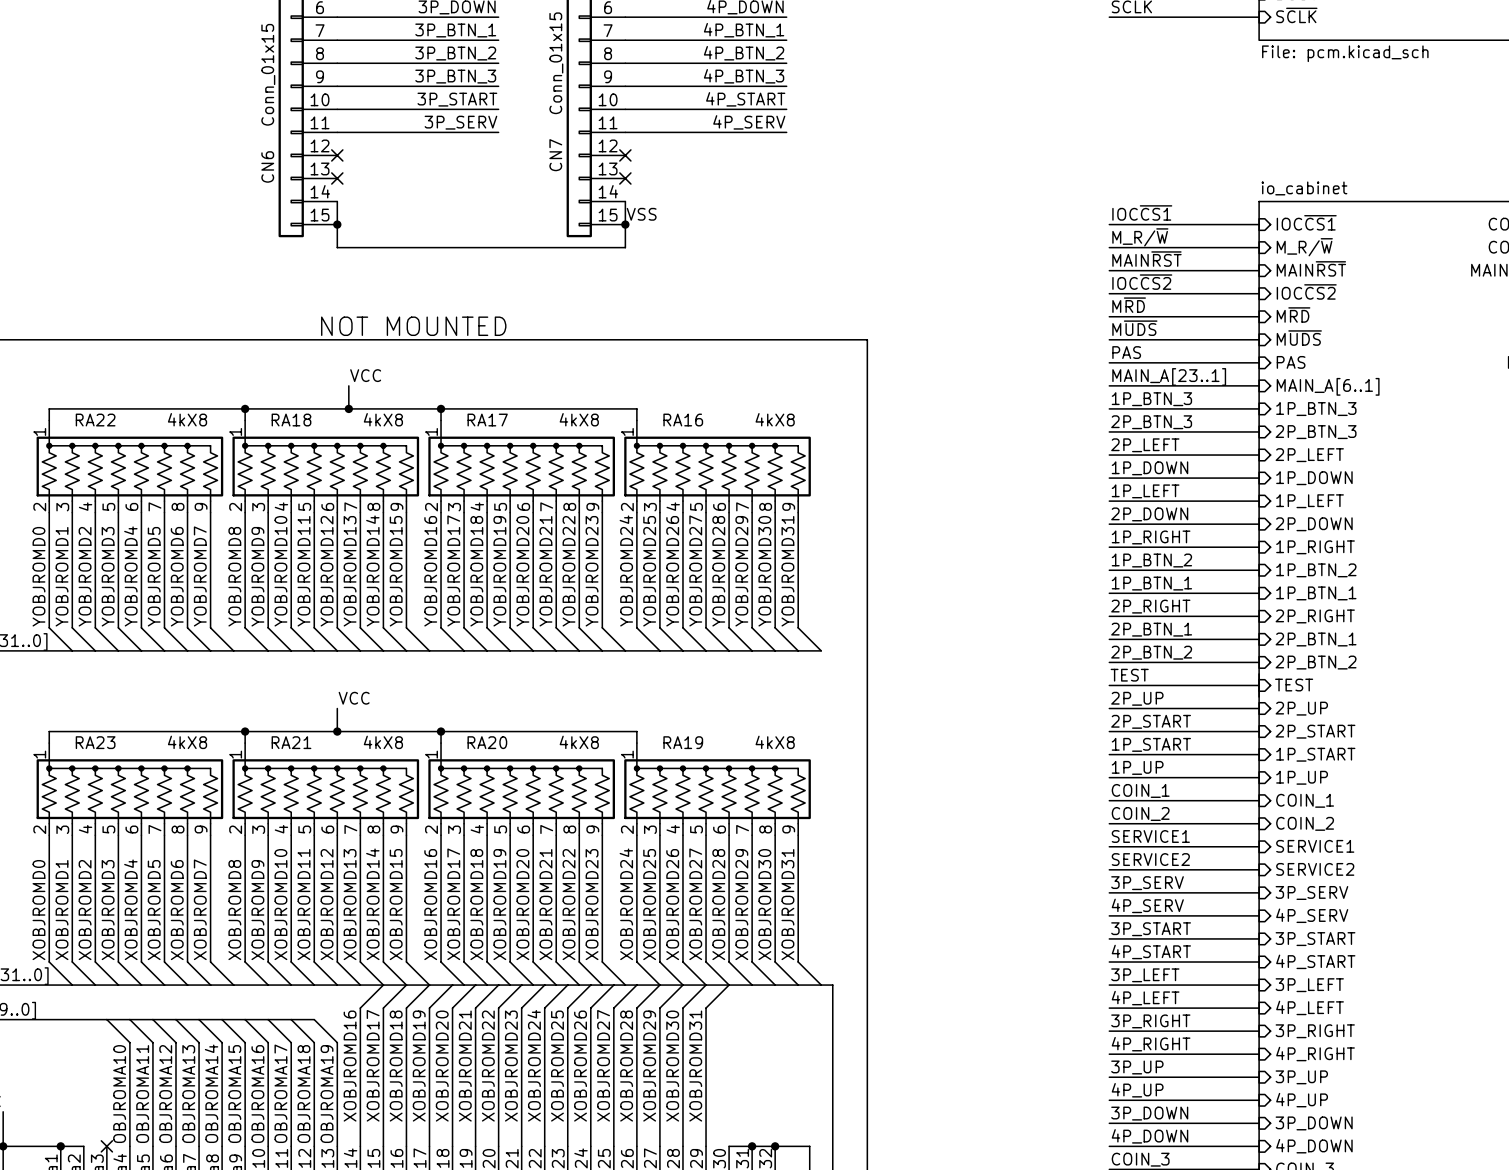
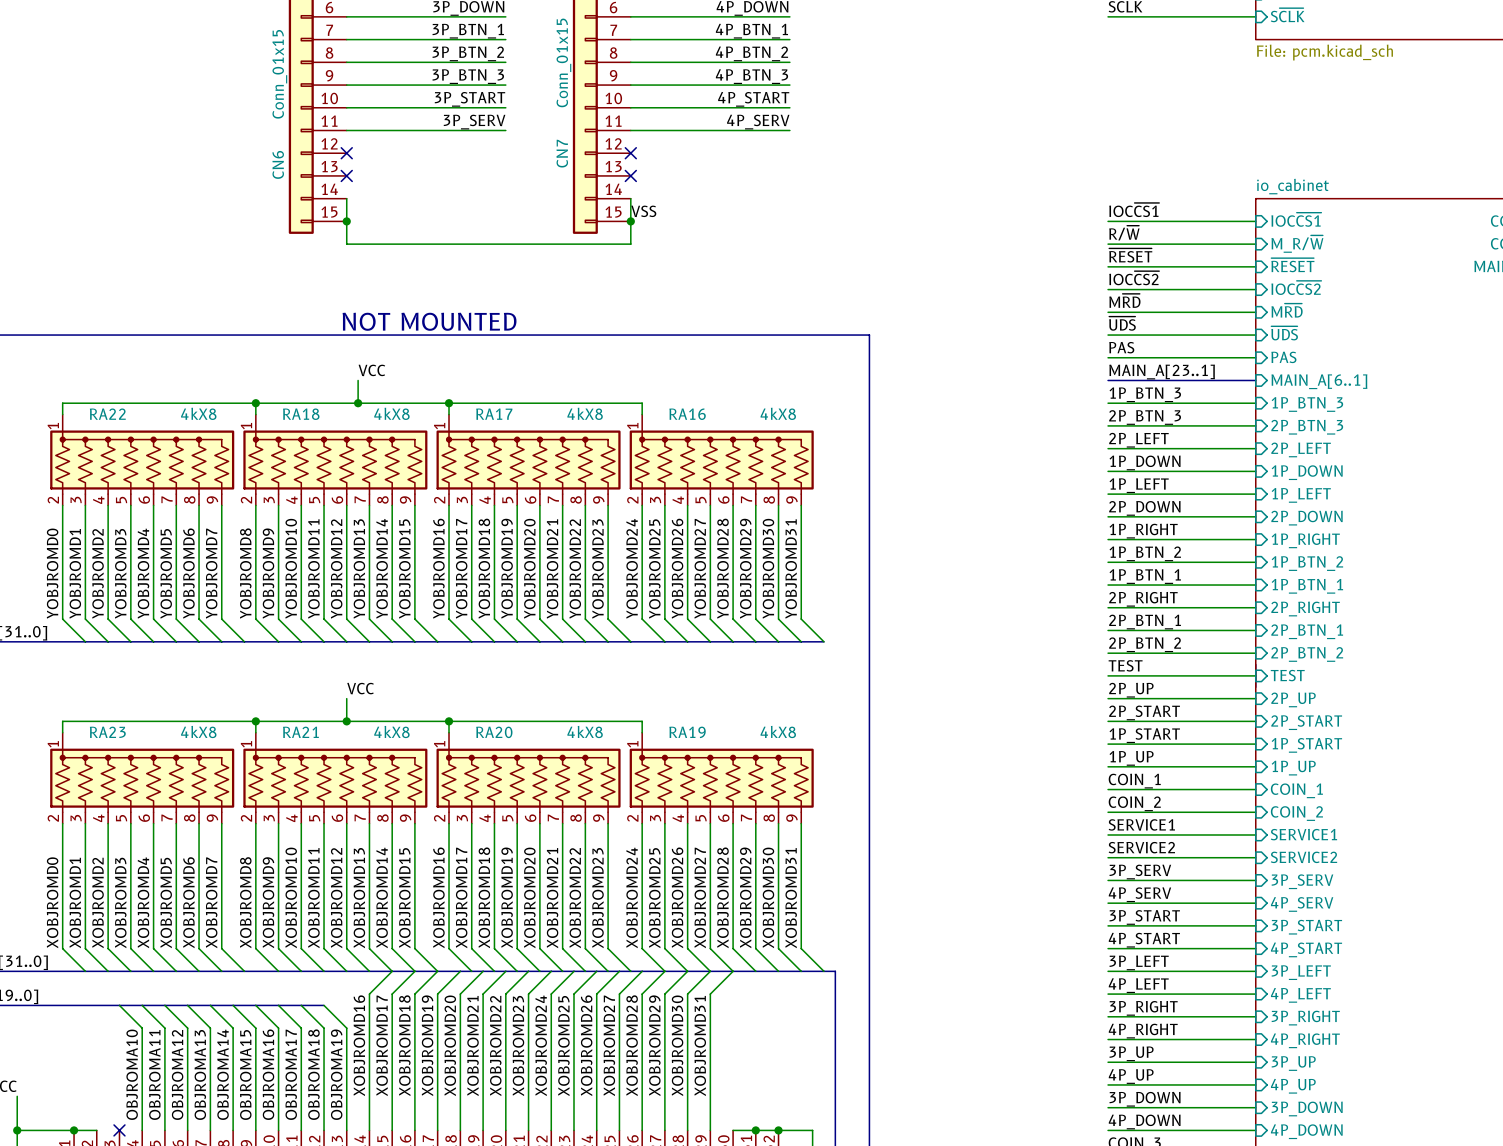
label: M_R/~{W} (1140, 237) -> R/~{W} (1124, 233)
label: MAIN~{RST} (1146, 259) -> ~{RESET} (1130, 255)
sheet pin: MAIN~{RST} (1311, 268) -> ~{RESET} (1292, 265)
label: M~{UDS} (1134, 328) -> ~{UDS} (1122, 323)
sheet pin: M~{UDS} (1299, 338) -> ~{UDS} (1284, 333)

